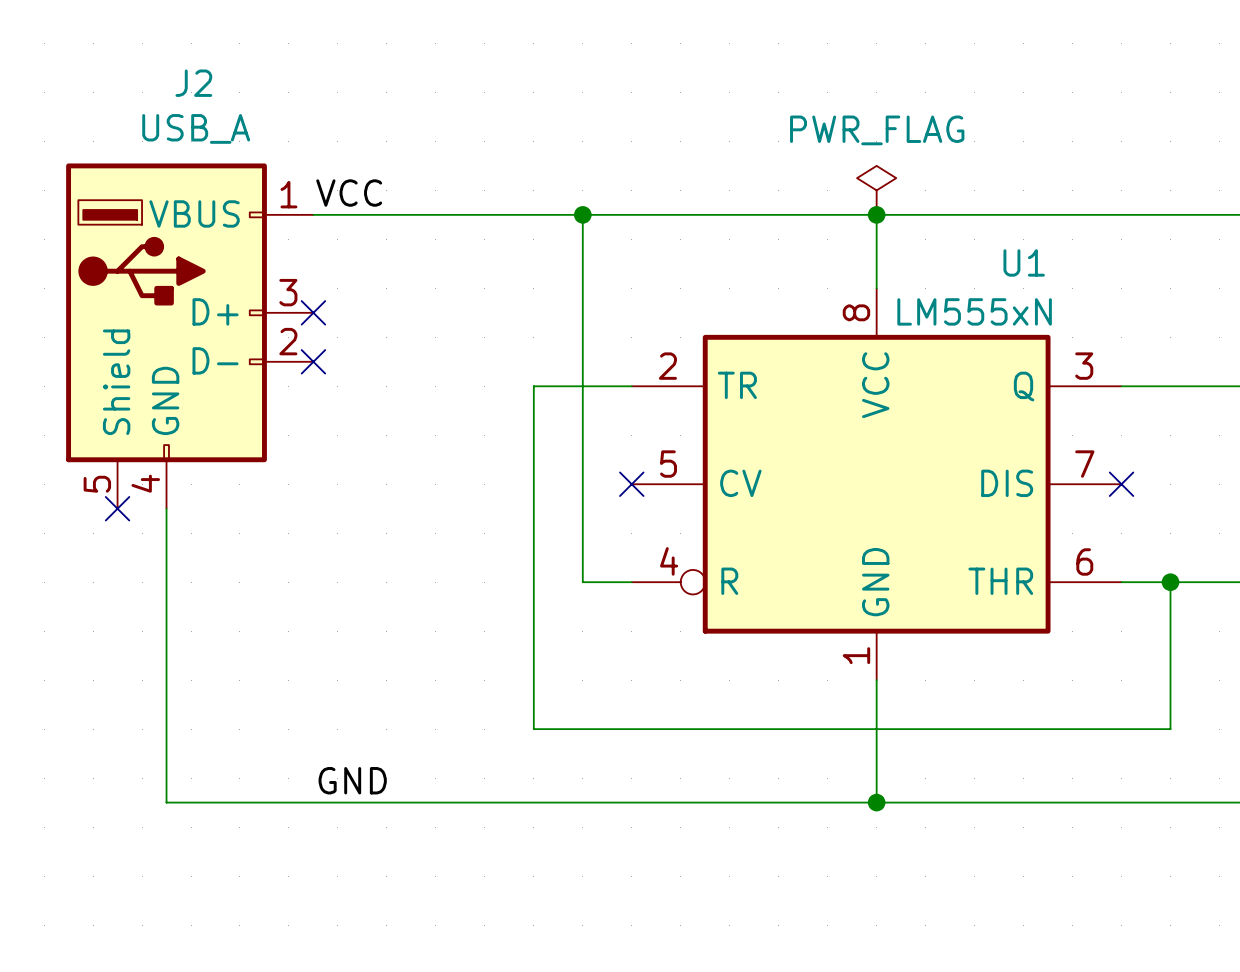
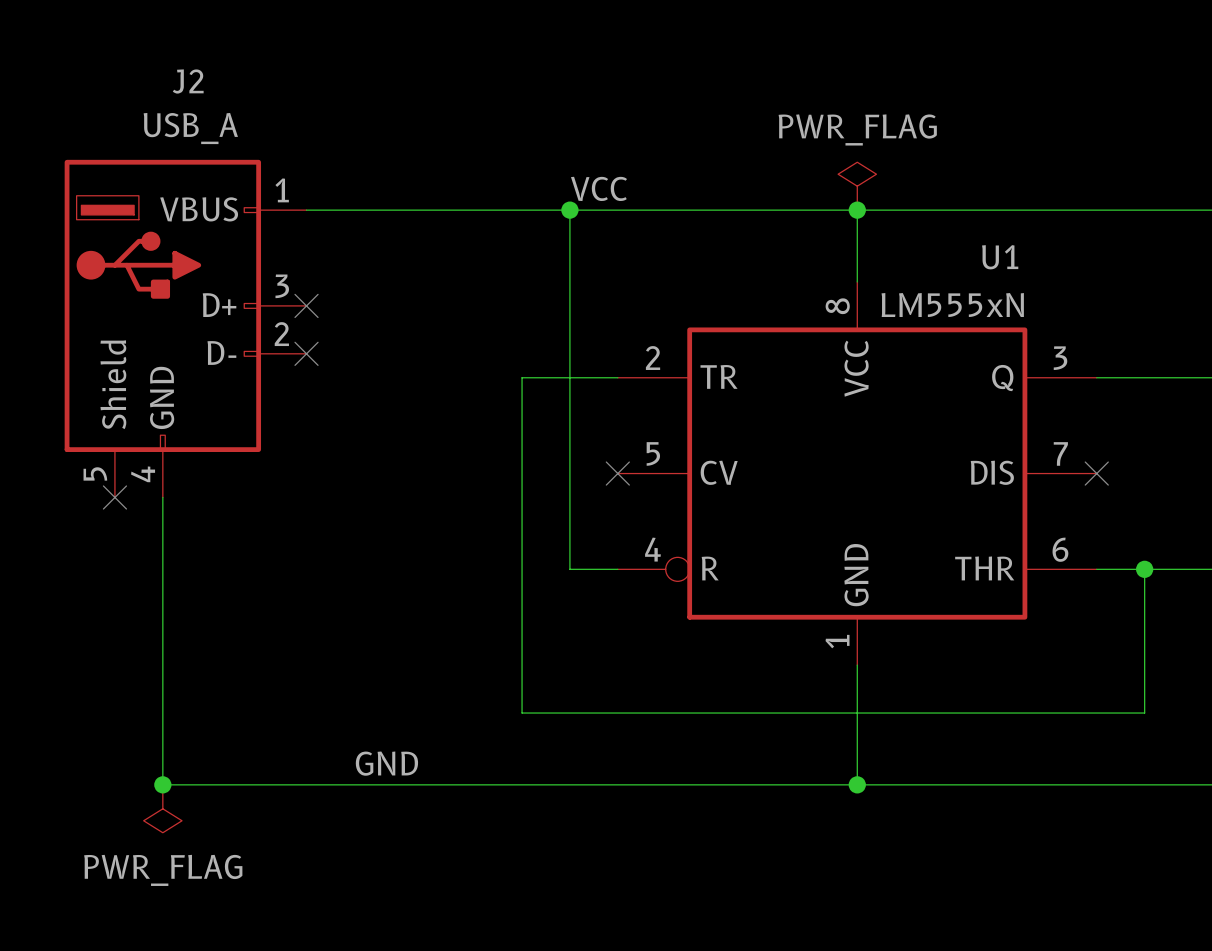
label position: VCC (349, 193) -> VCC (599, 188)
label position: GND (352, 780) -> GND (386, 763)
junction: none -> (162, 784)
power symbol: none -> PWR_FLAG (162, 808)

